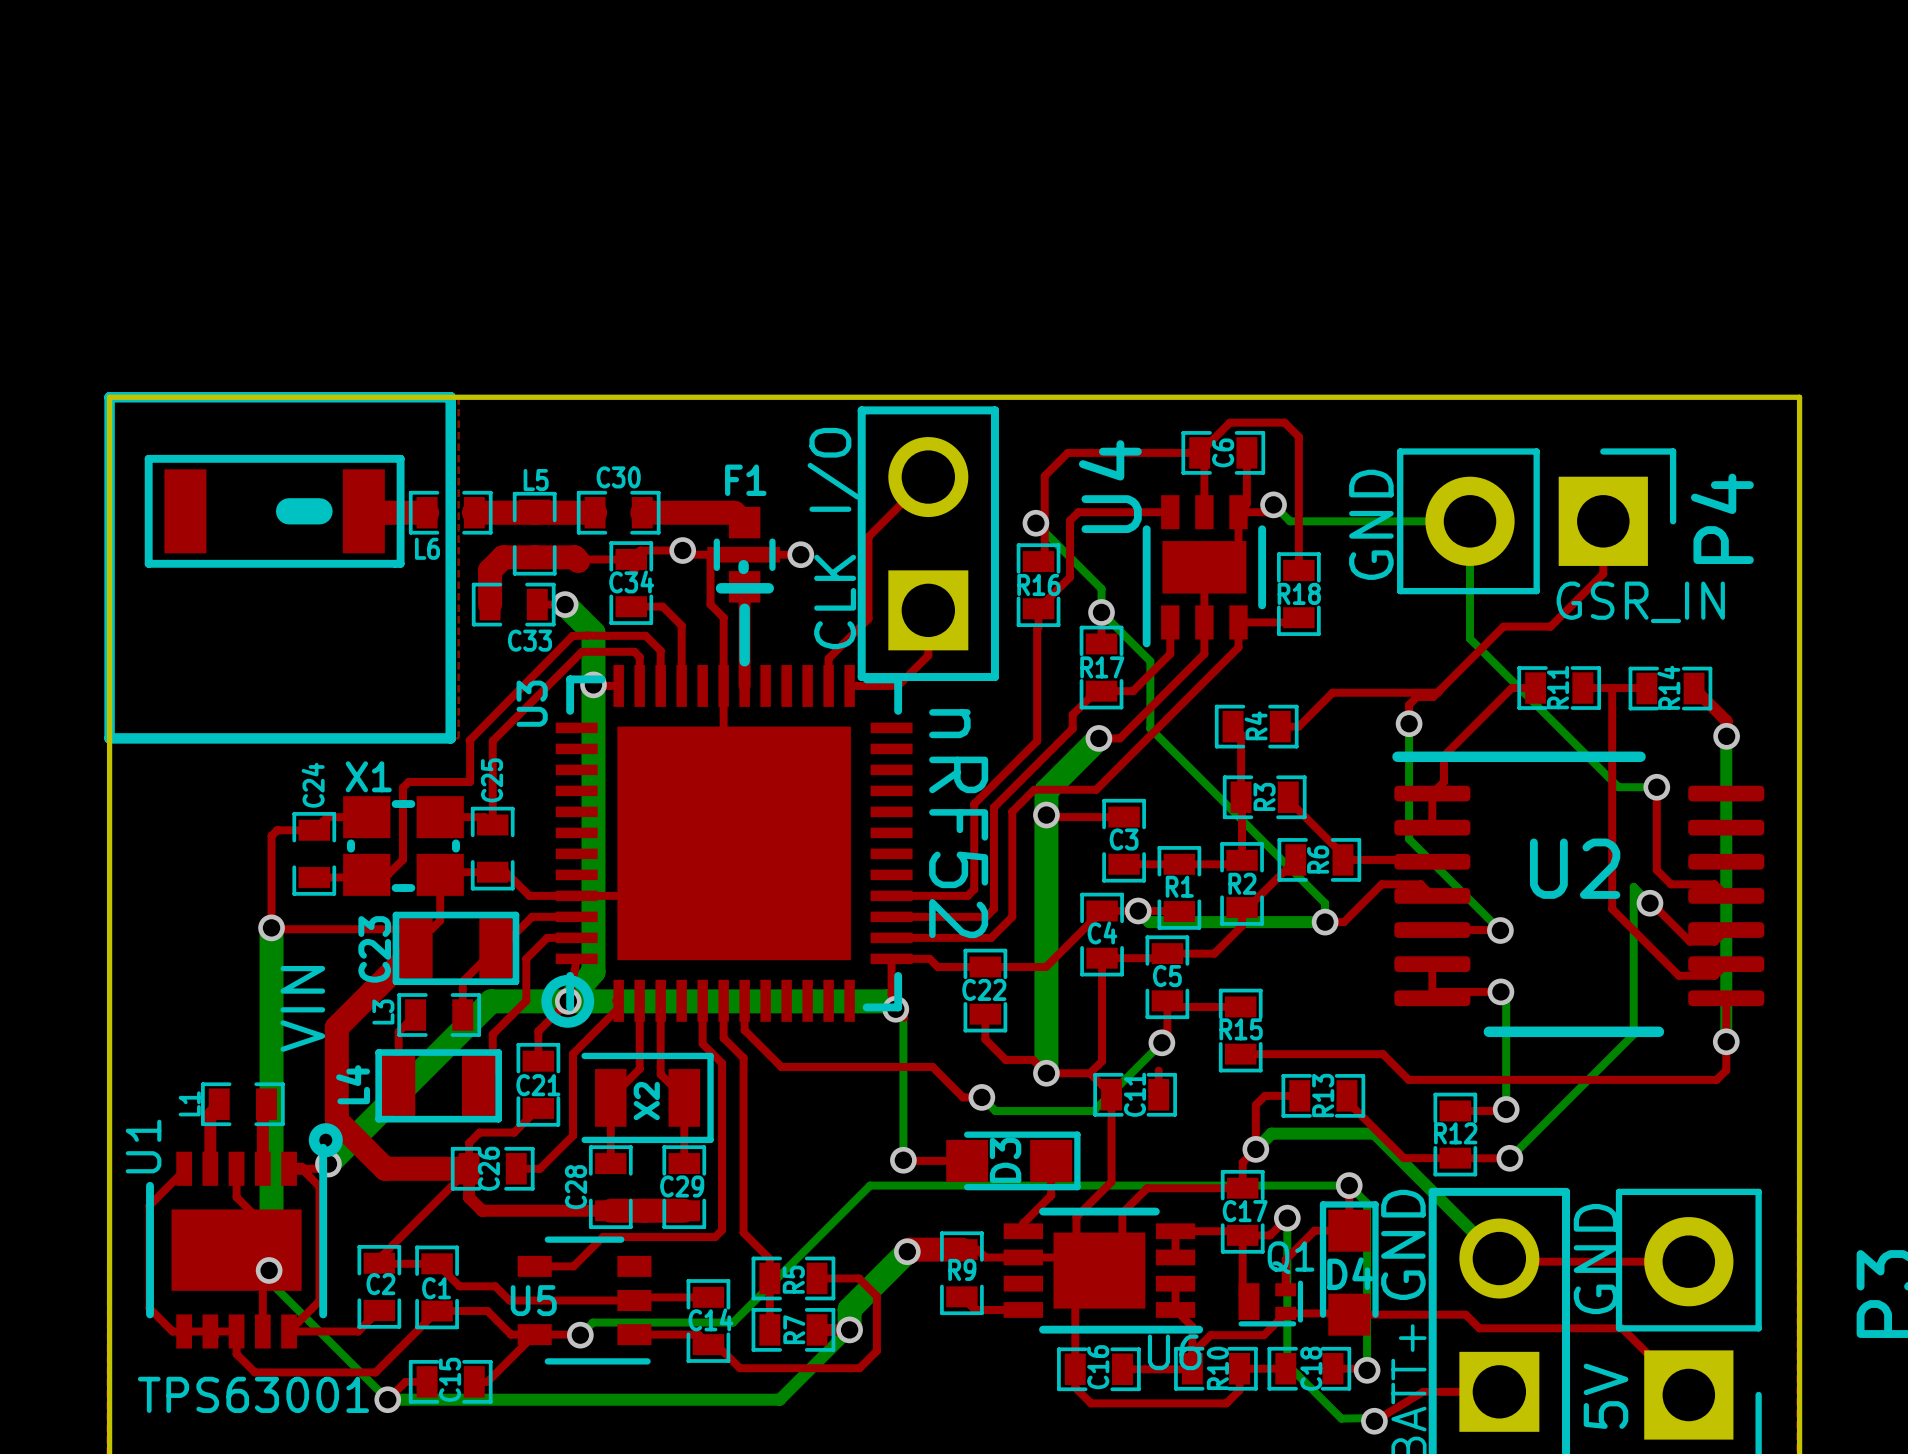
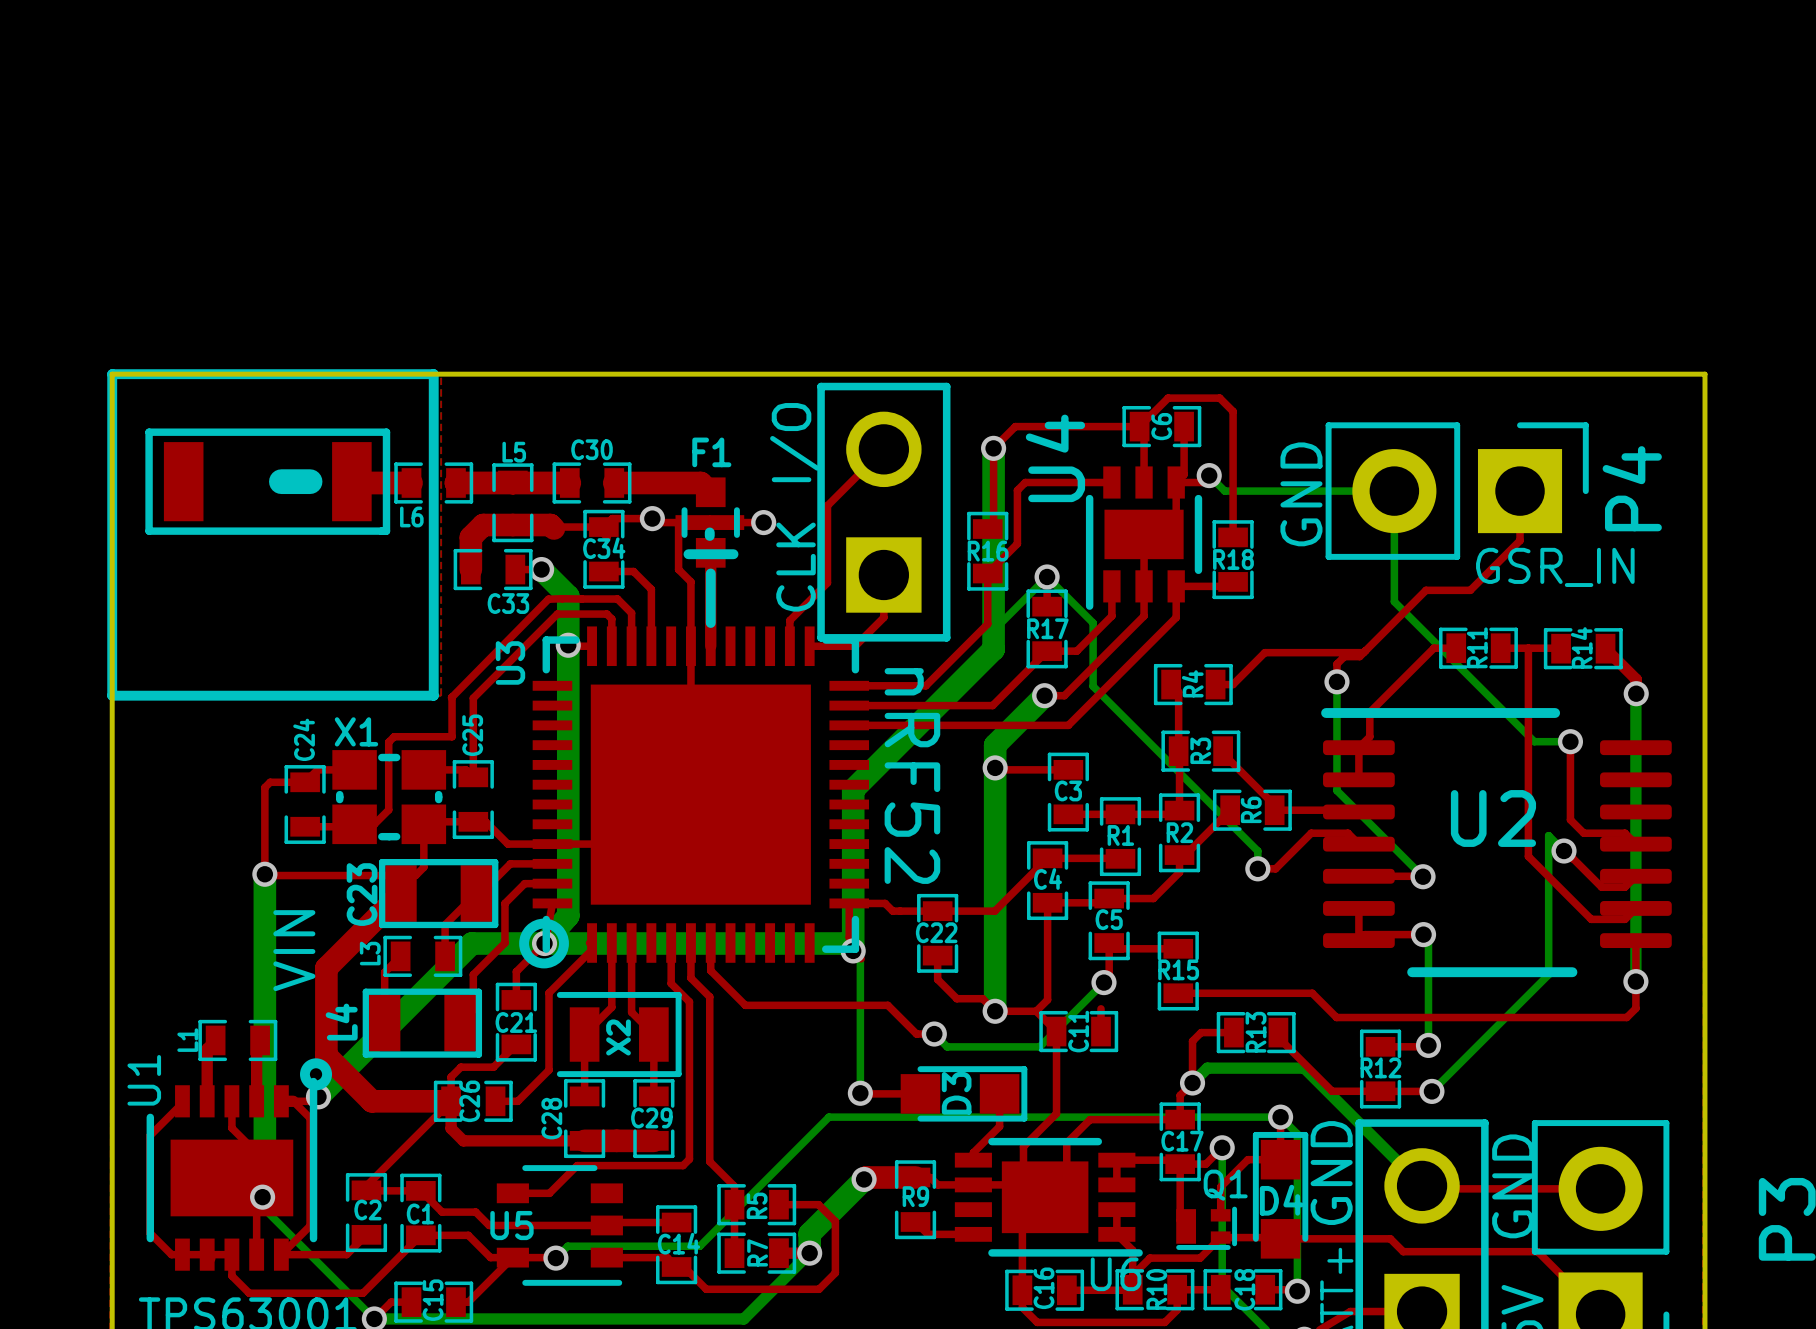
bottom track: none -> (993, 448) (993, 649) (853, 789) (853, 950)
bottom track: (1035, 523) (1101, 588) (1101, 612) -> (993, 649) (993, 630) (1047, 576)
via position: (1035, 523) -> (993, 448)
top track: (1038, 627) (1037, 741) (974, 804) (974, 889) (967, 895) (891, 895) -> (987, 590) (987, 623) (925, 685) (864, 685)
top track: (1238, 647) (1096, 789) (1034, 789) (1012, 811) (1012, 916) (991, 937) (891, 937) -> (1176, 609) (1176, 617) (1068, 725) (849, 725)
top track: (1101, 691) (1096, 691) (1072, 714) (1072, 728) (993, 807) (993, 908) (986, 916) (891, 916) -> (1047, 651) (992, 705) (849, 705)
bottom track: (1138, 910) (1149, 922) (1325, 922) -> none
via: (1138, 910) -> none

